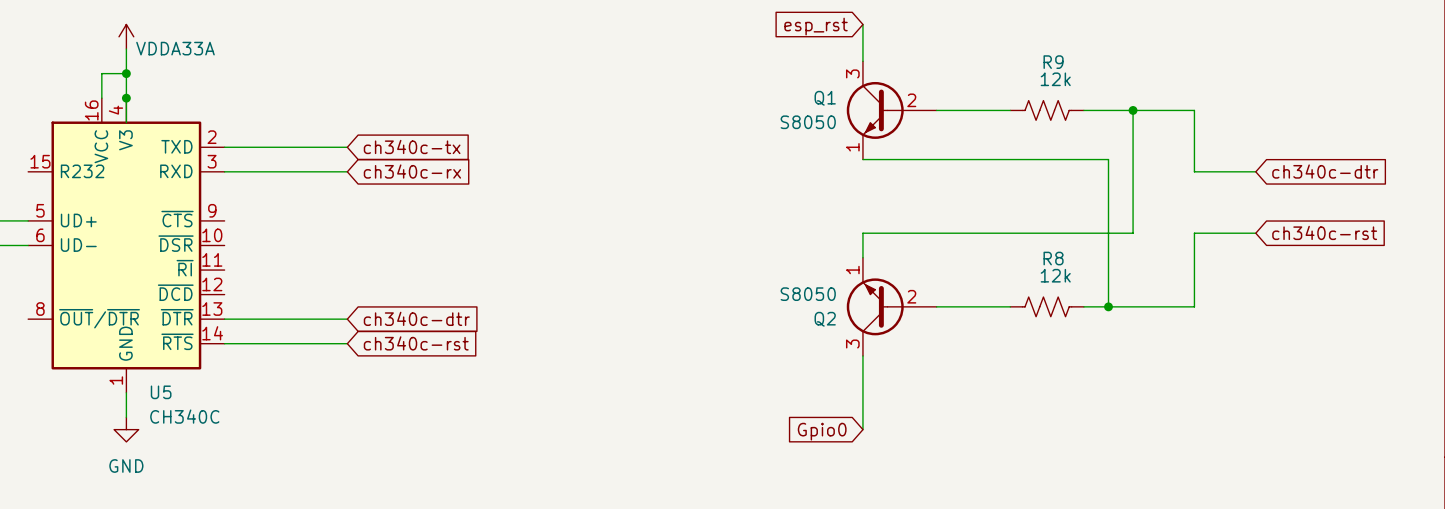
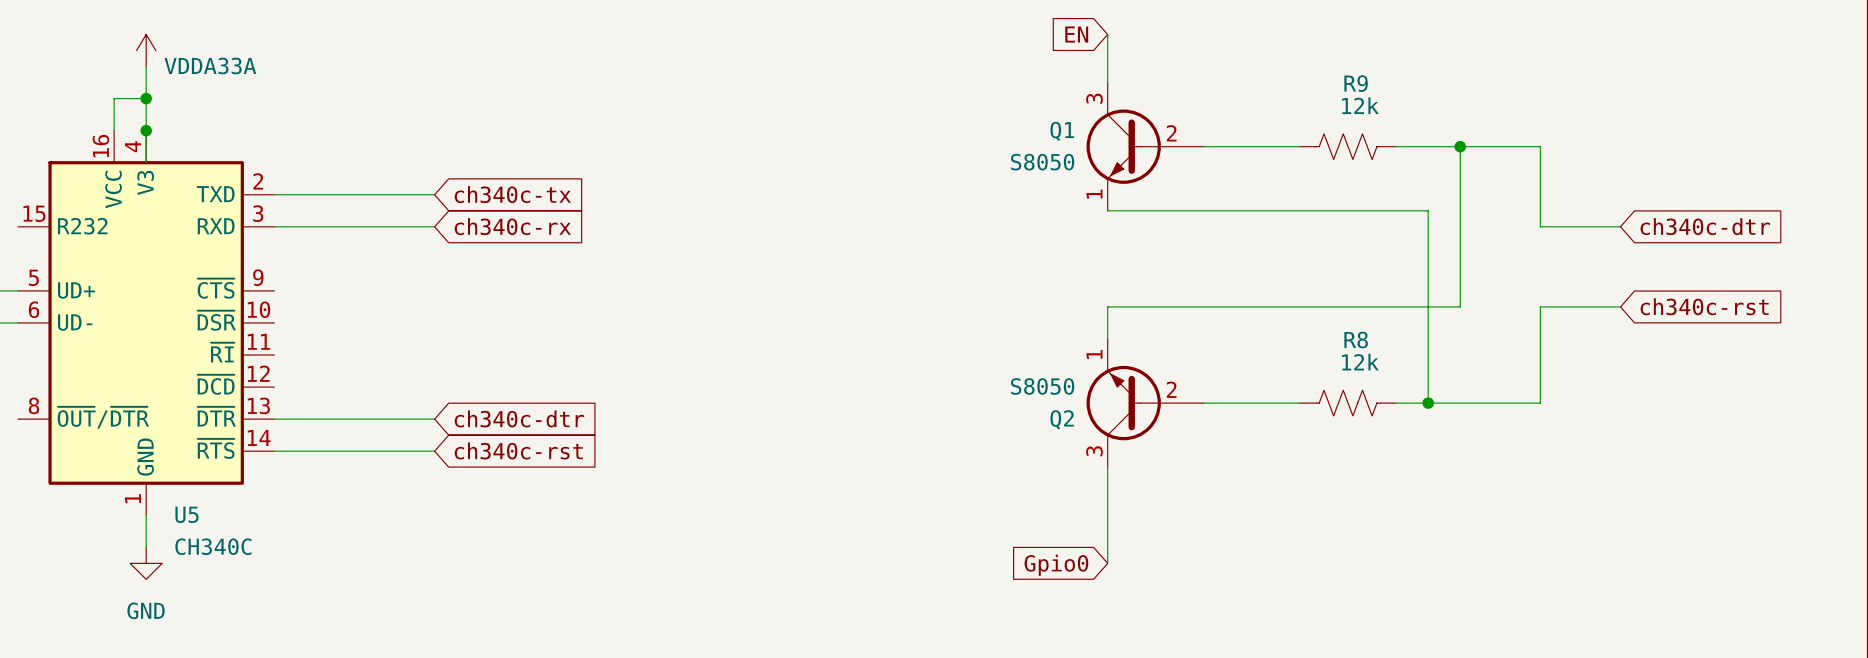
global label: esp_rst (816, 26) -> EN (1076, 34)

